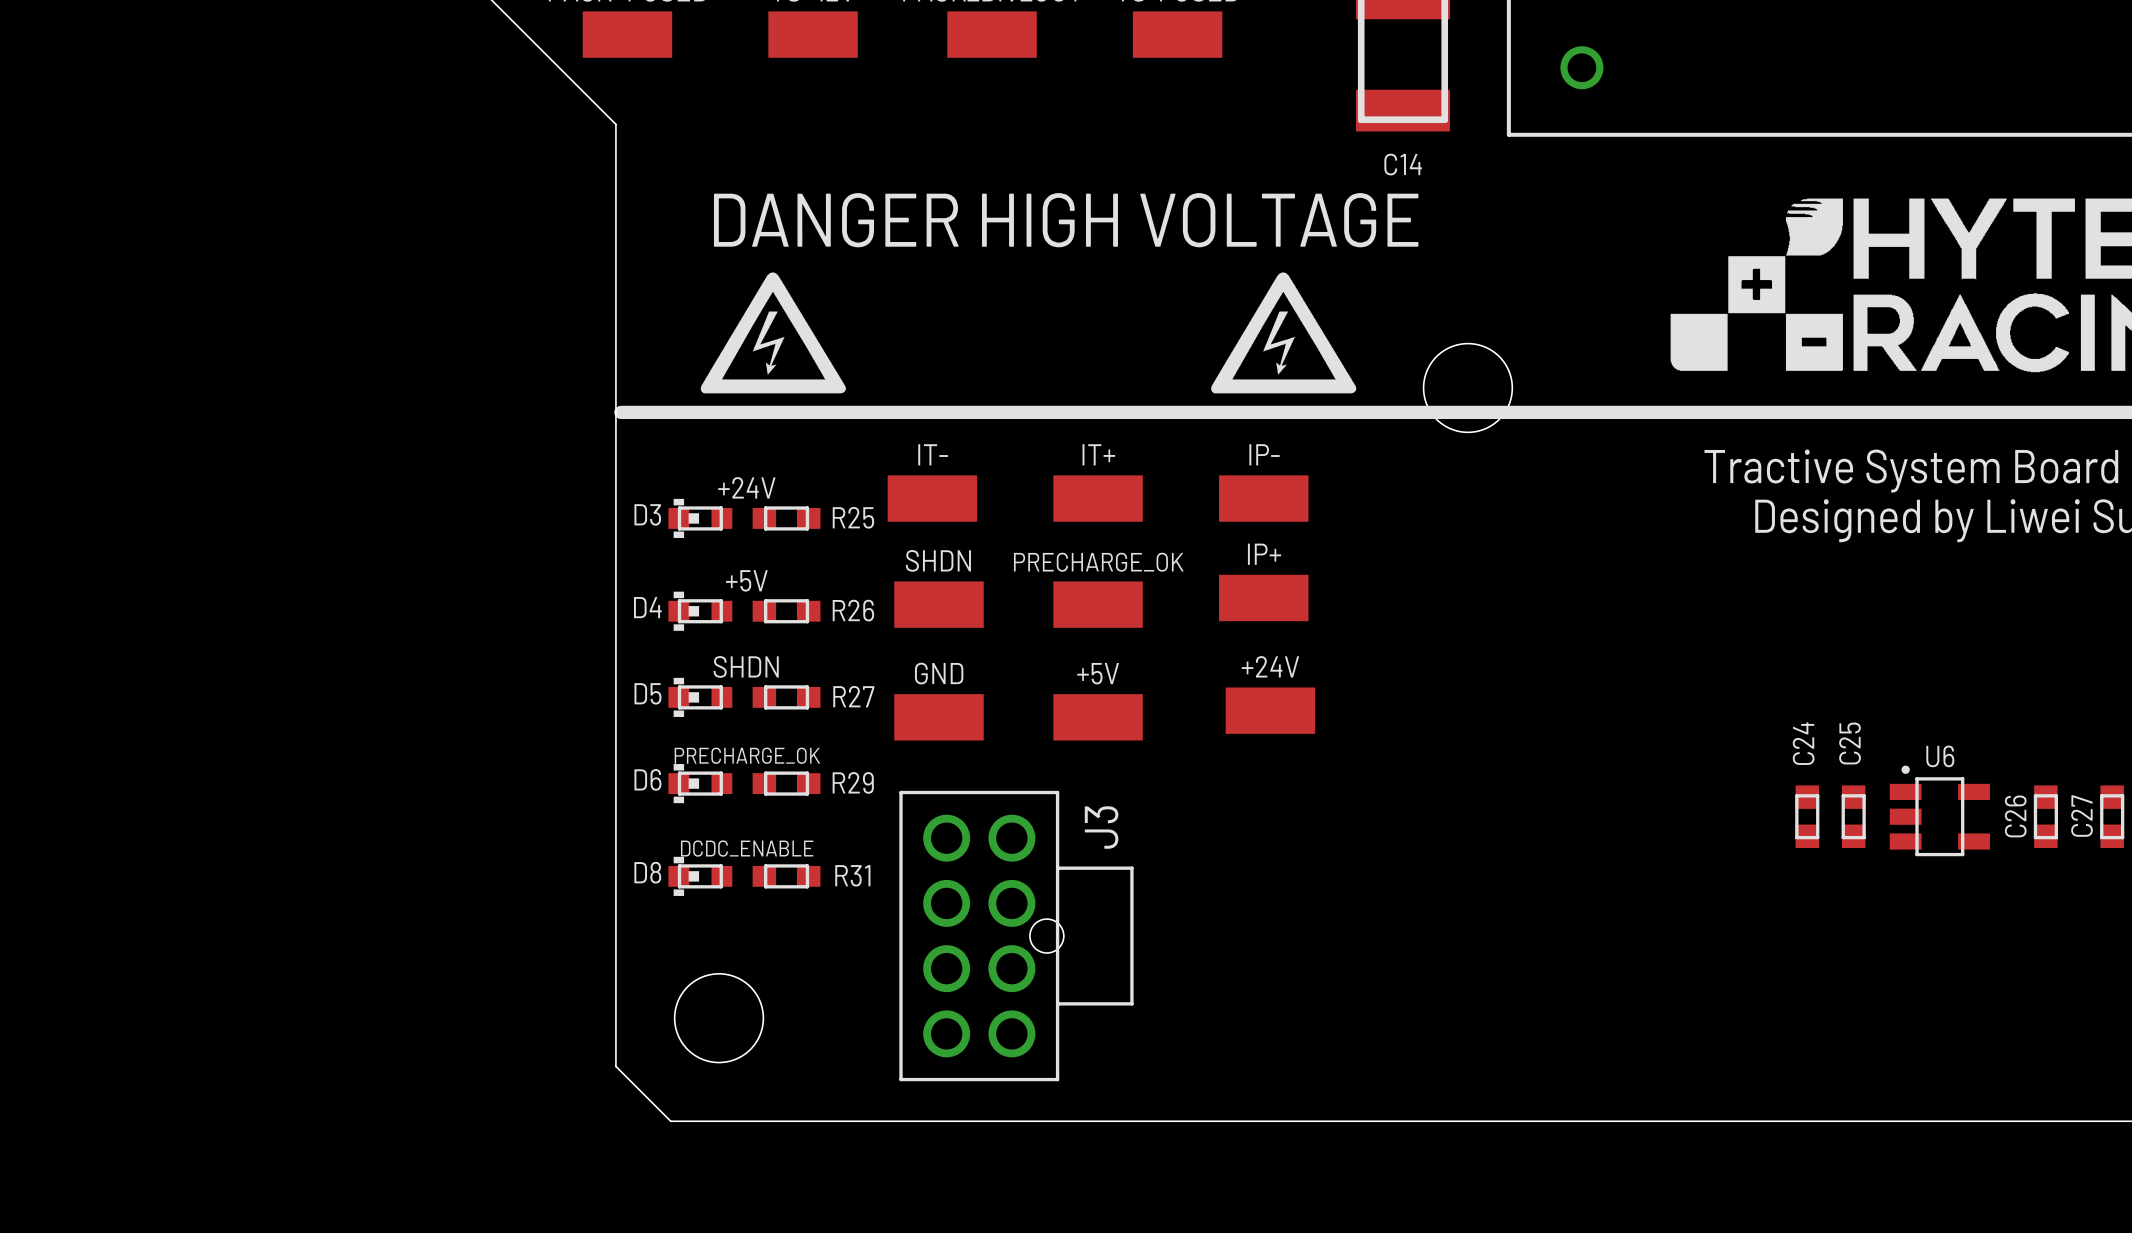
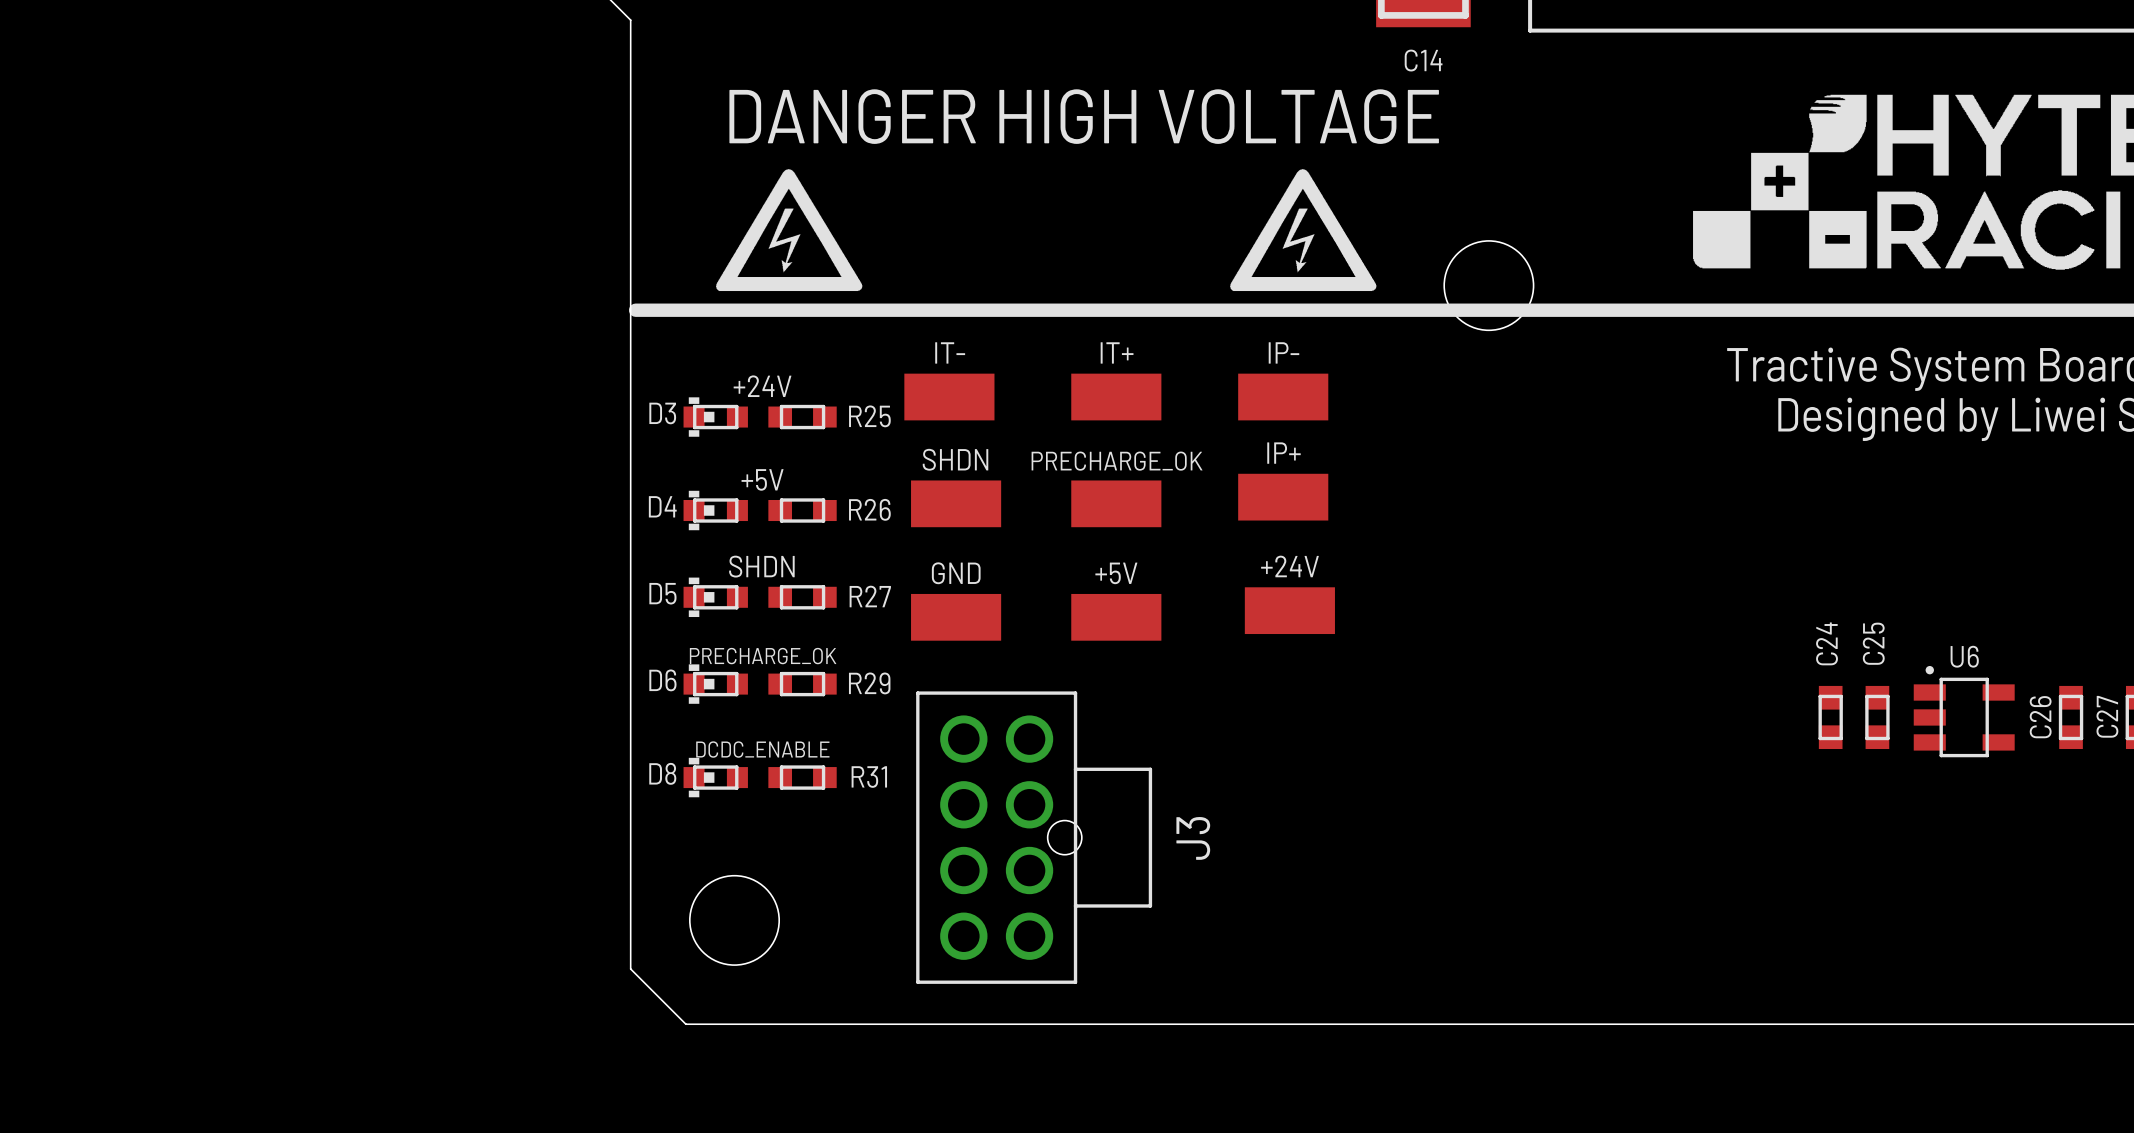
J3 name position: J3 (1101, 827) -> J3 (1193, 838)

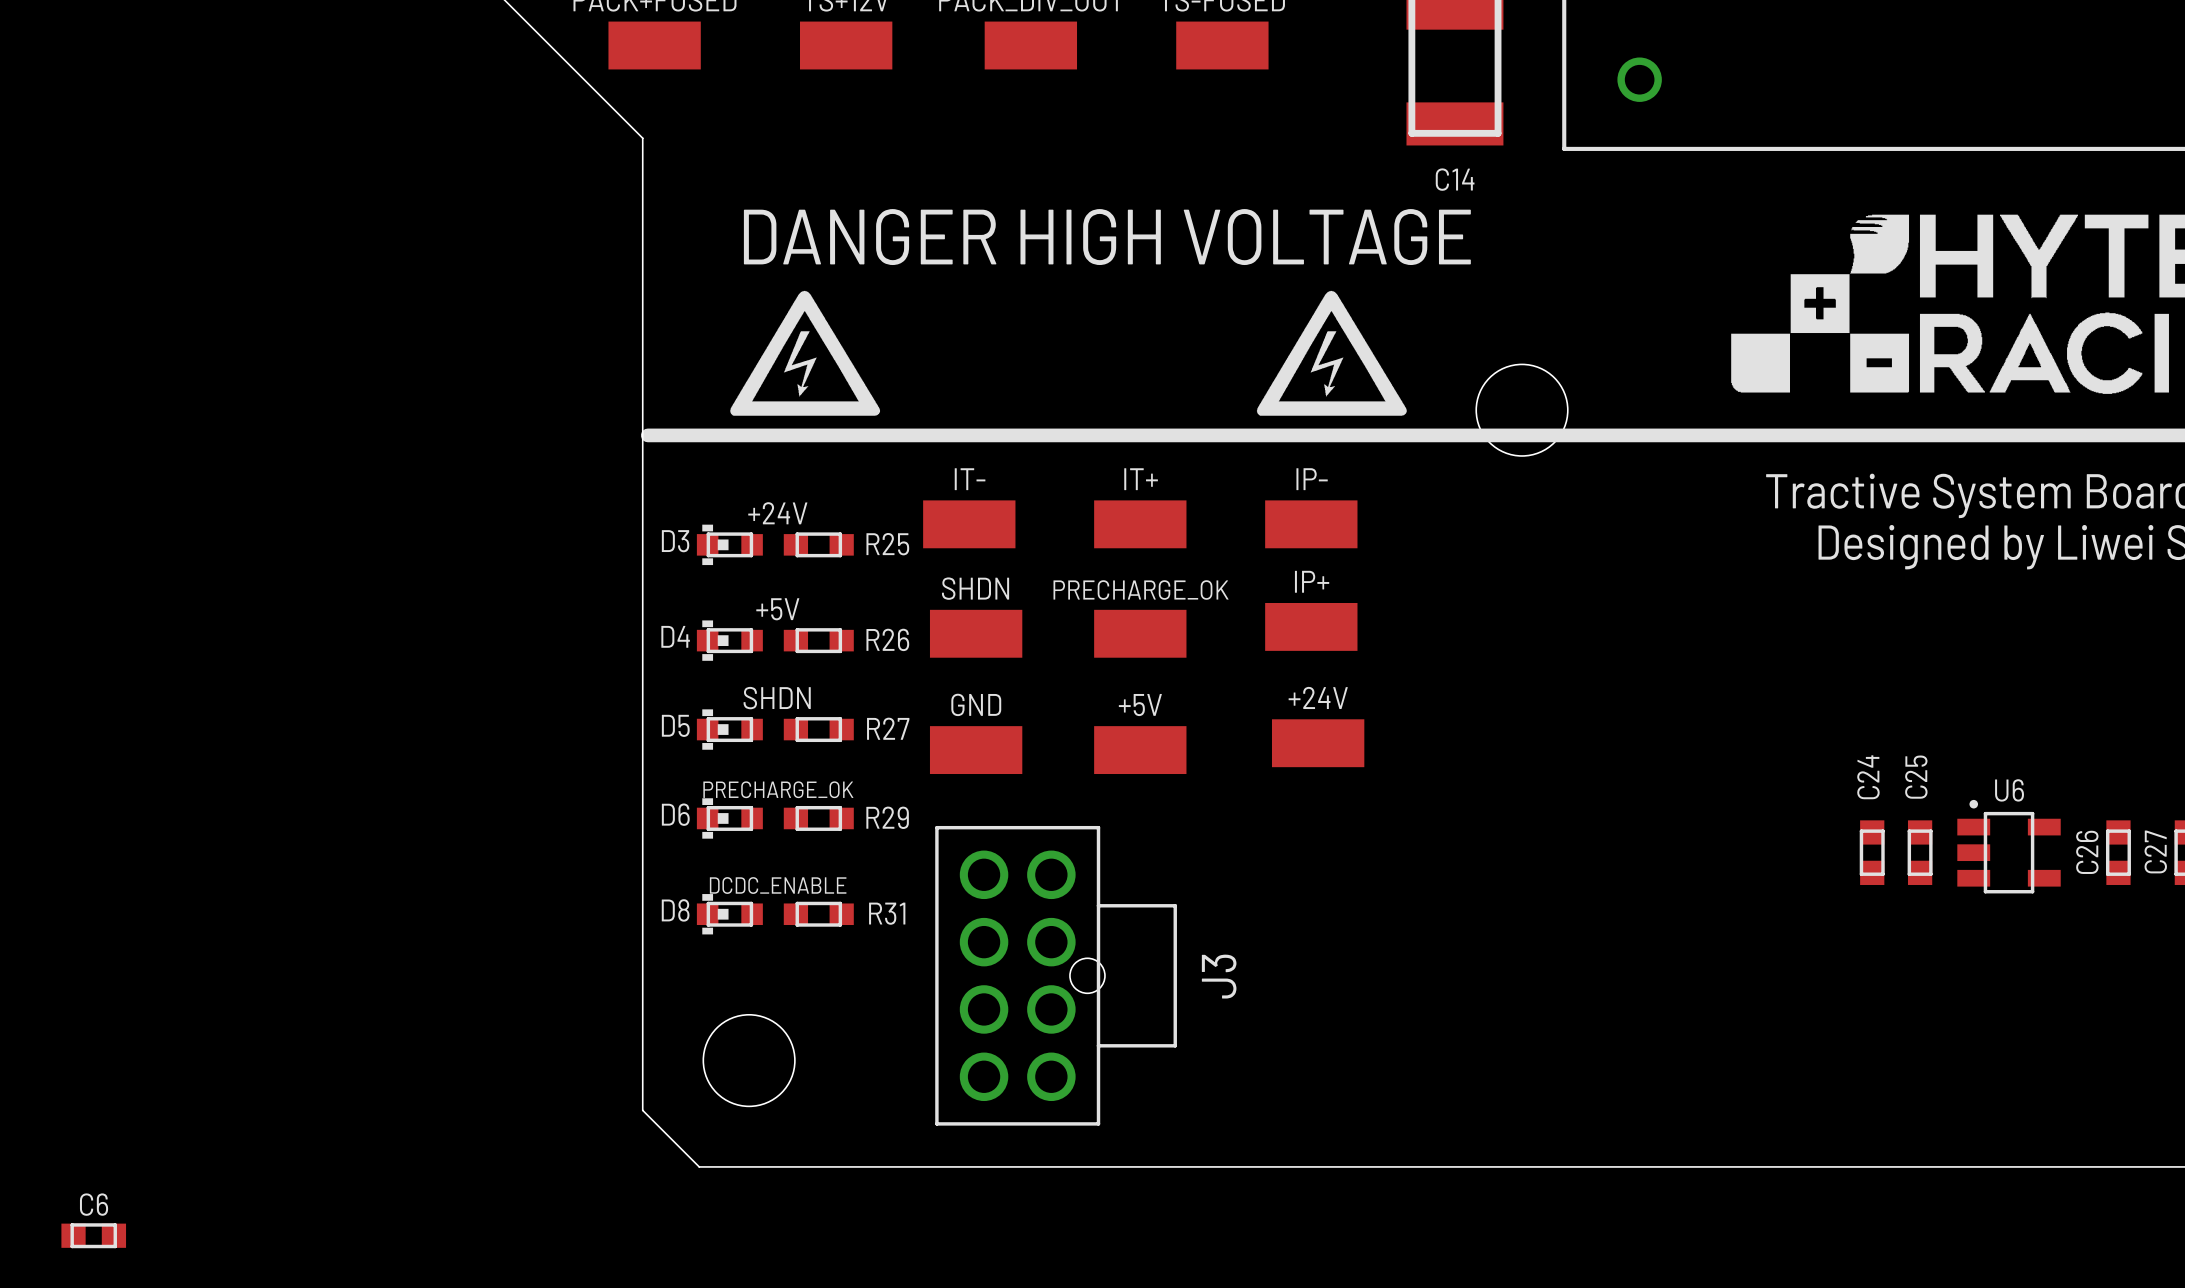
C6: none -> (93, 1235)

